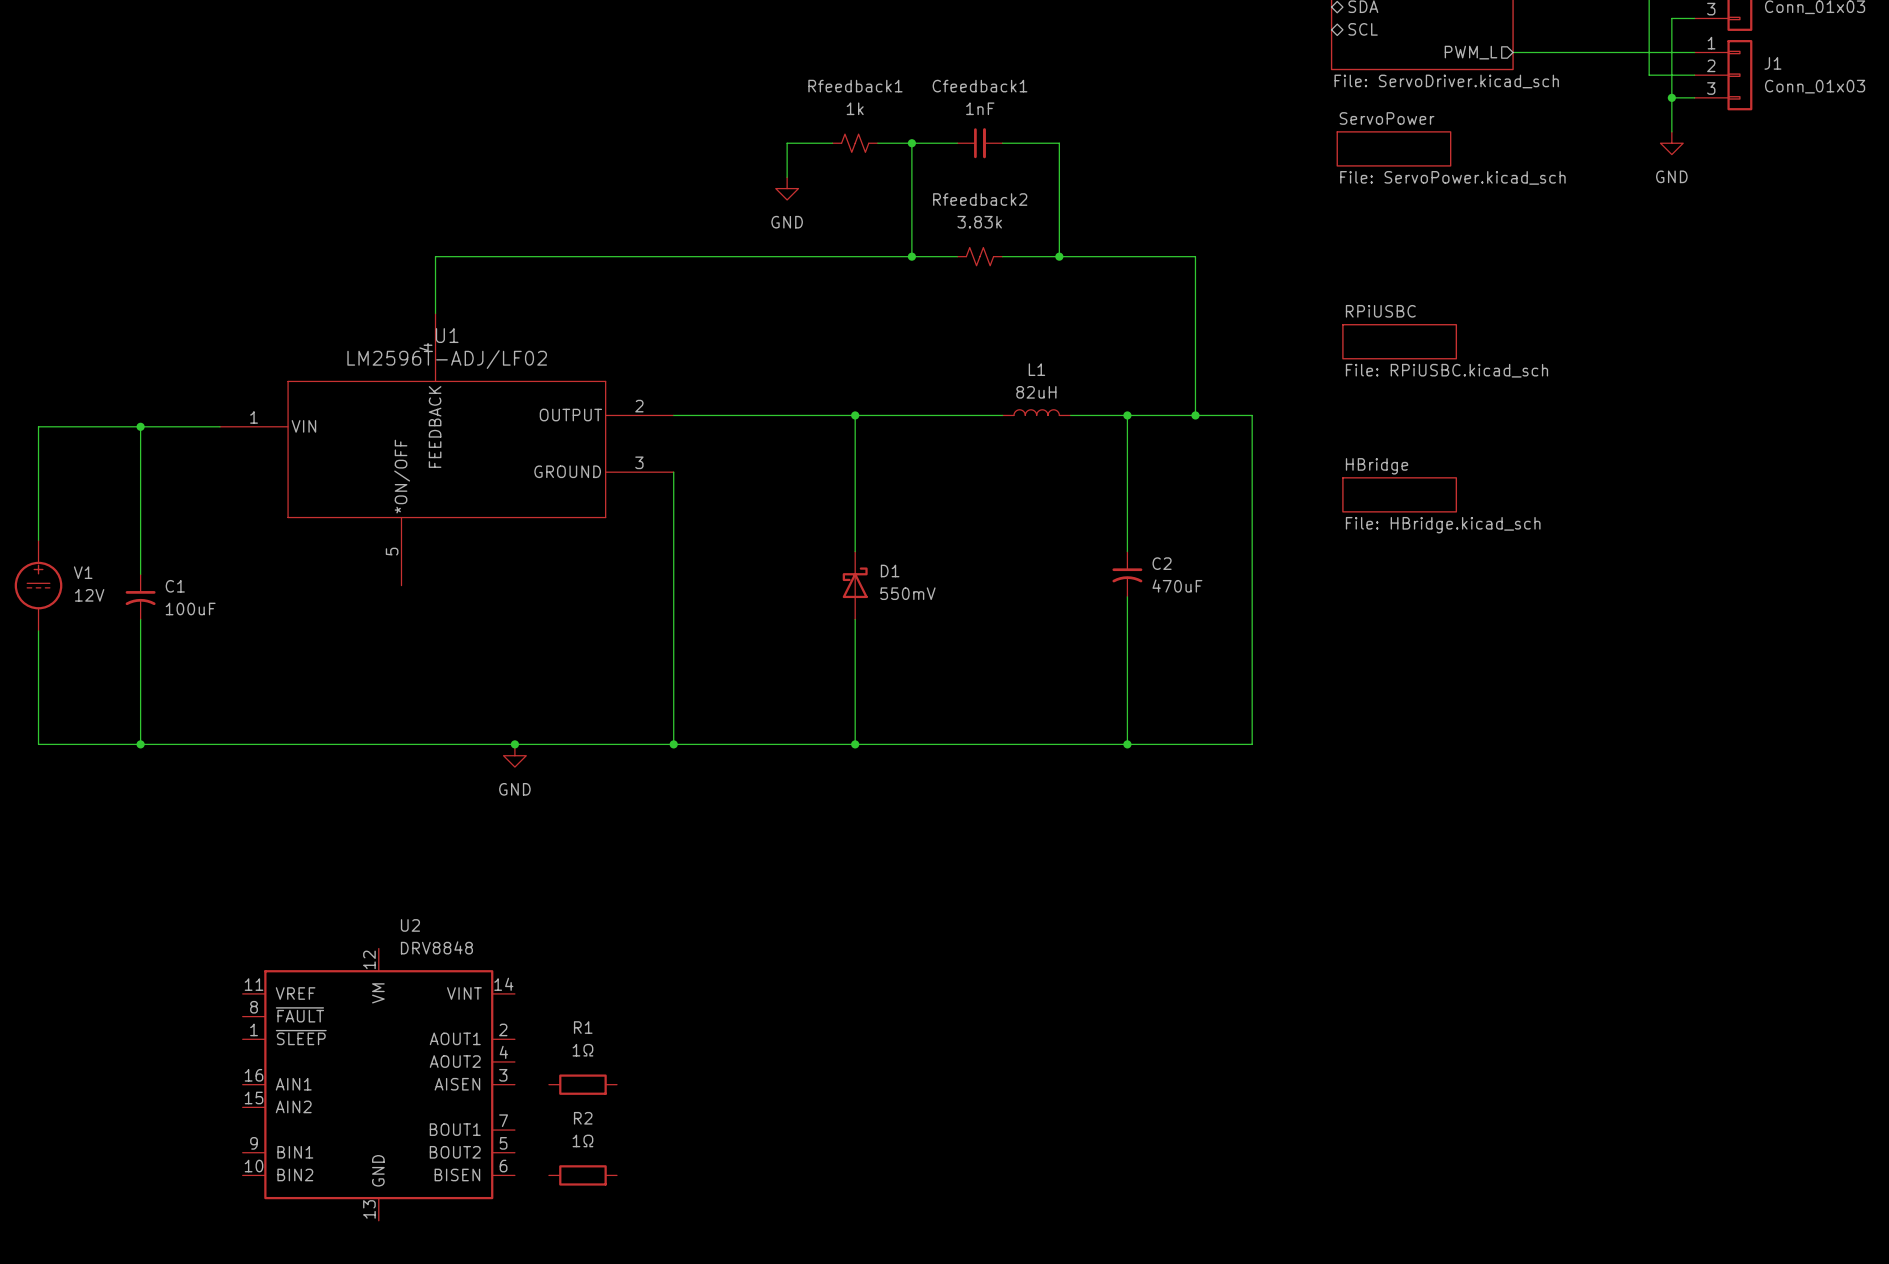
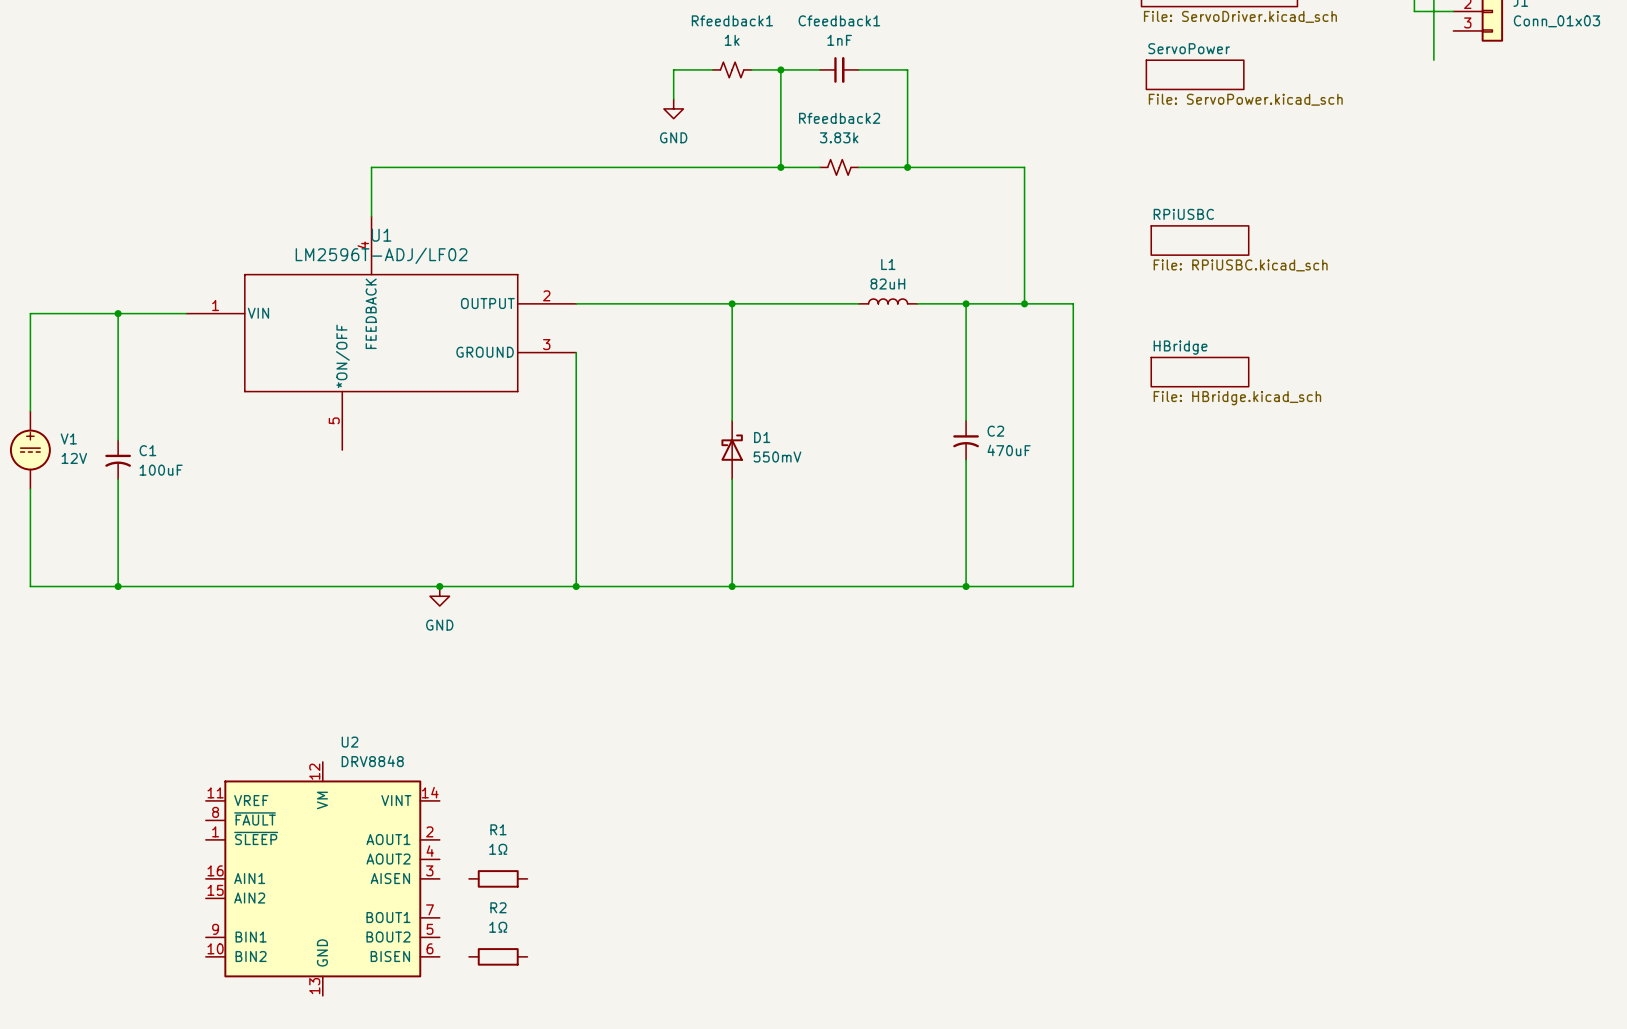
wire: (1671, 97) (1694, 97) -> none
junction: (1671, 97) -> none
power symbol: GND (1671, 143) -> none

